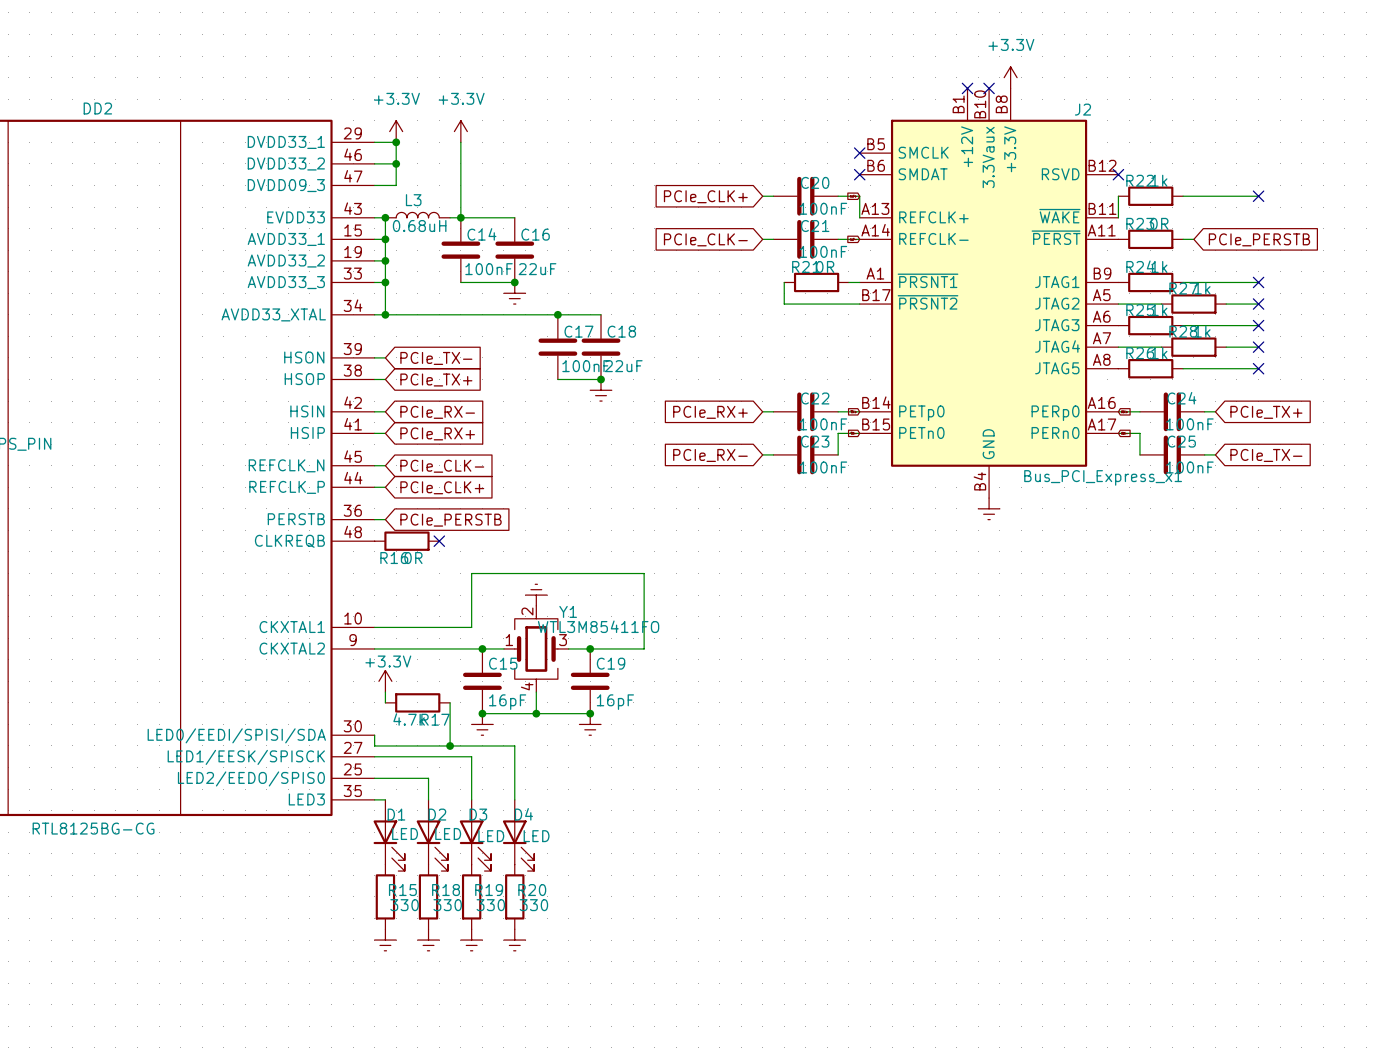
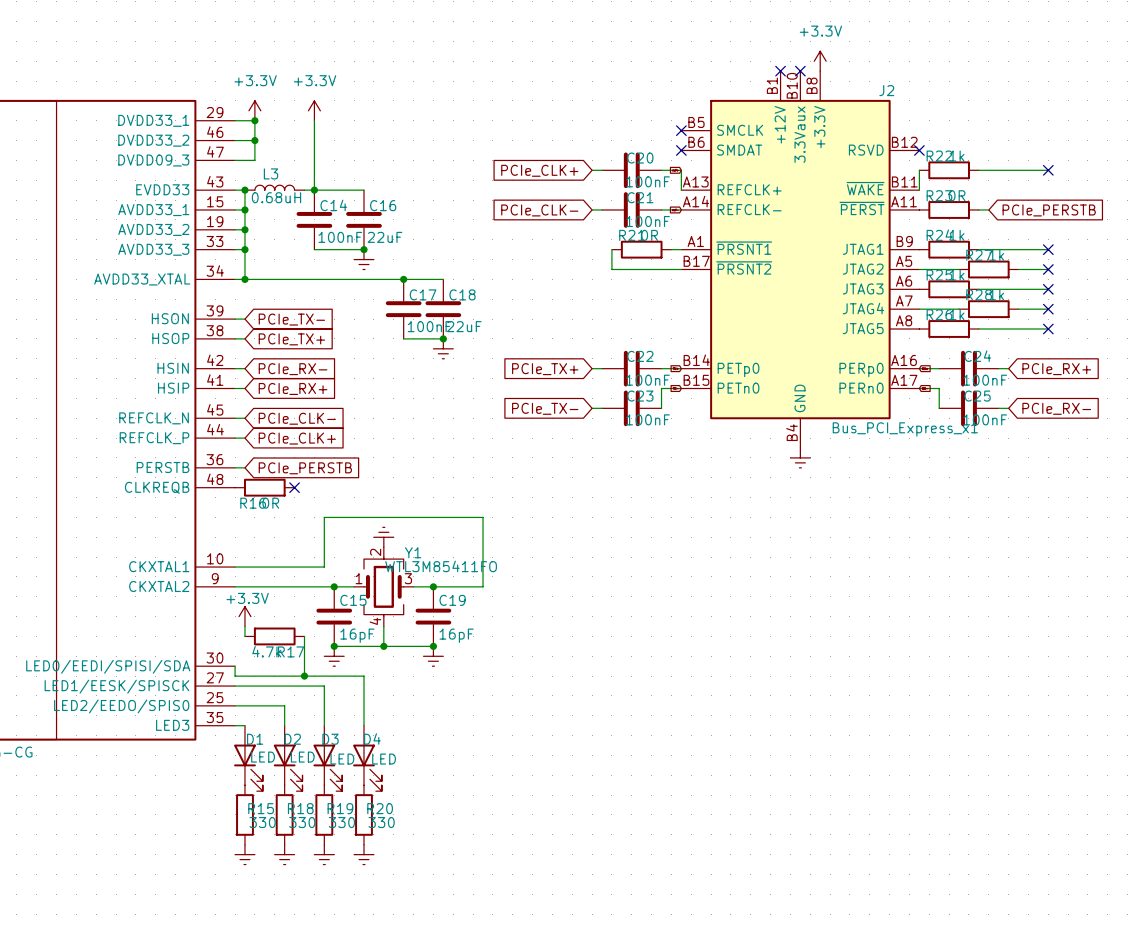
global label: PCIe_RX+ (710, 412) -> PCIe_TX+ (545, 369)
global label: PCIe_TX+ (1266, 412) -> PCIe_RX+ (1056, 369)
global label: PCIe_RX- (710, 455) -> PCIe_TX- (545, 408)
global label: PCIe_TX- (1266, 455) -> PCIe_RX- (1056, 408)

